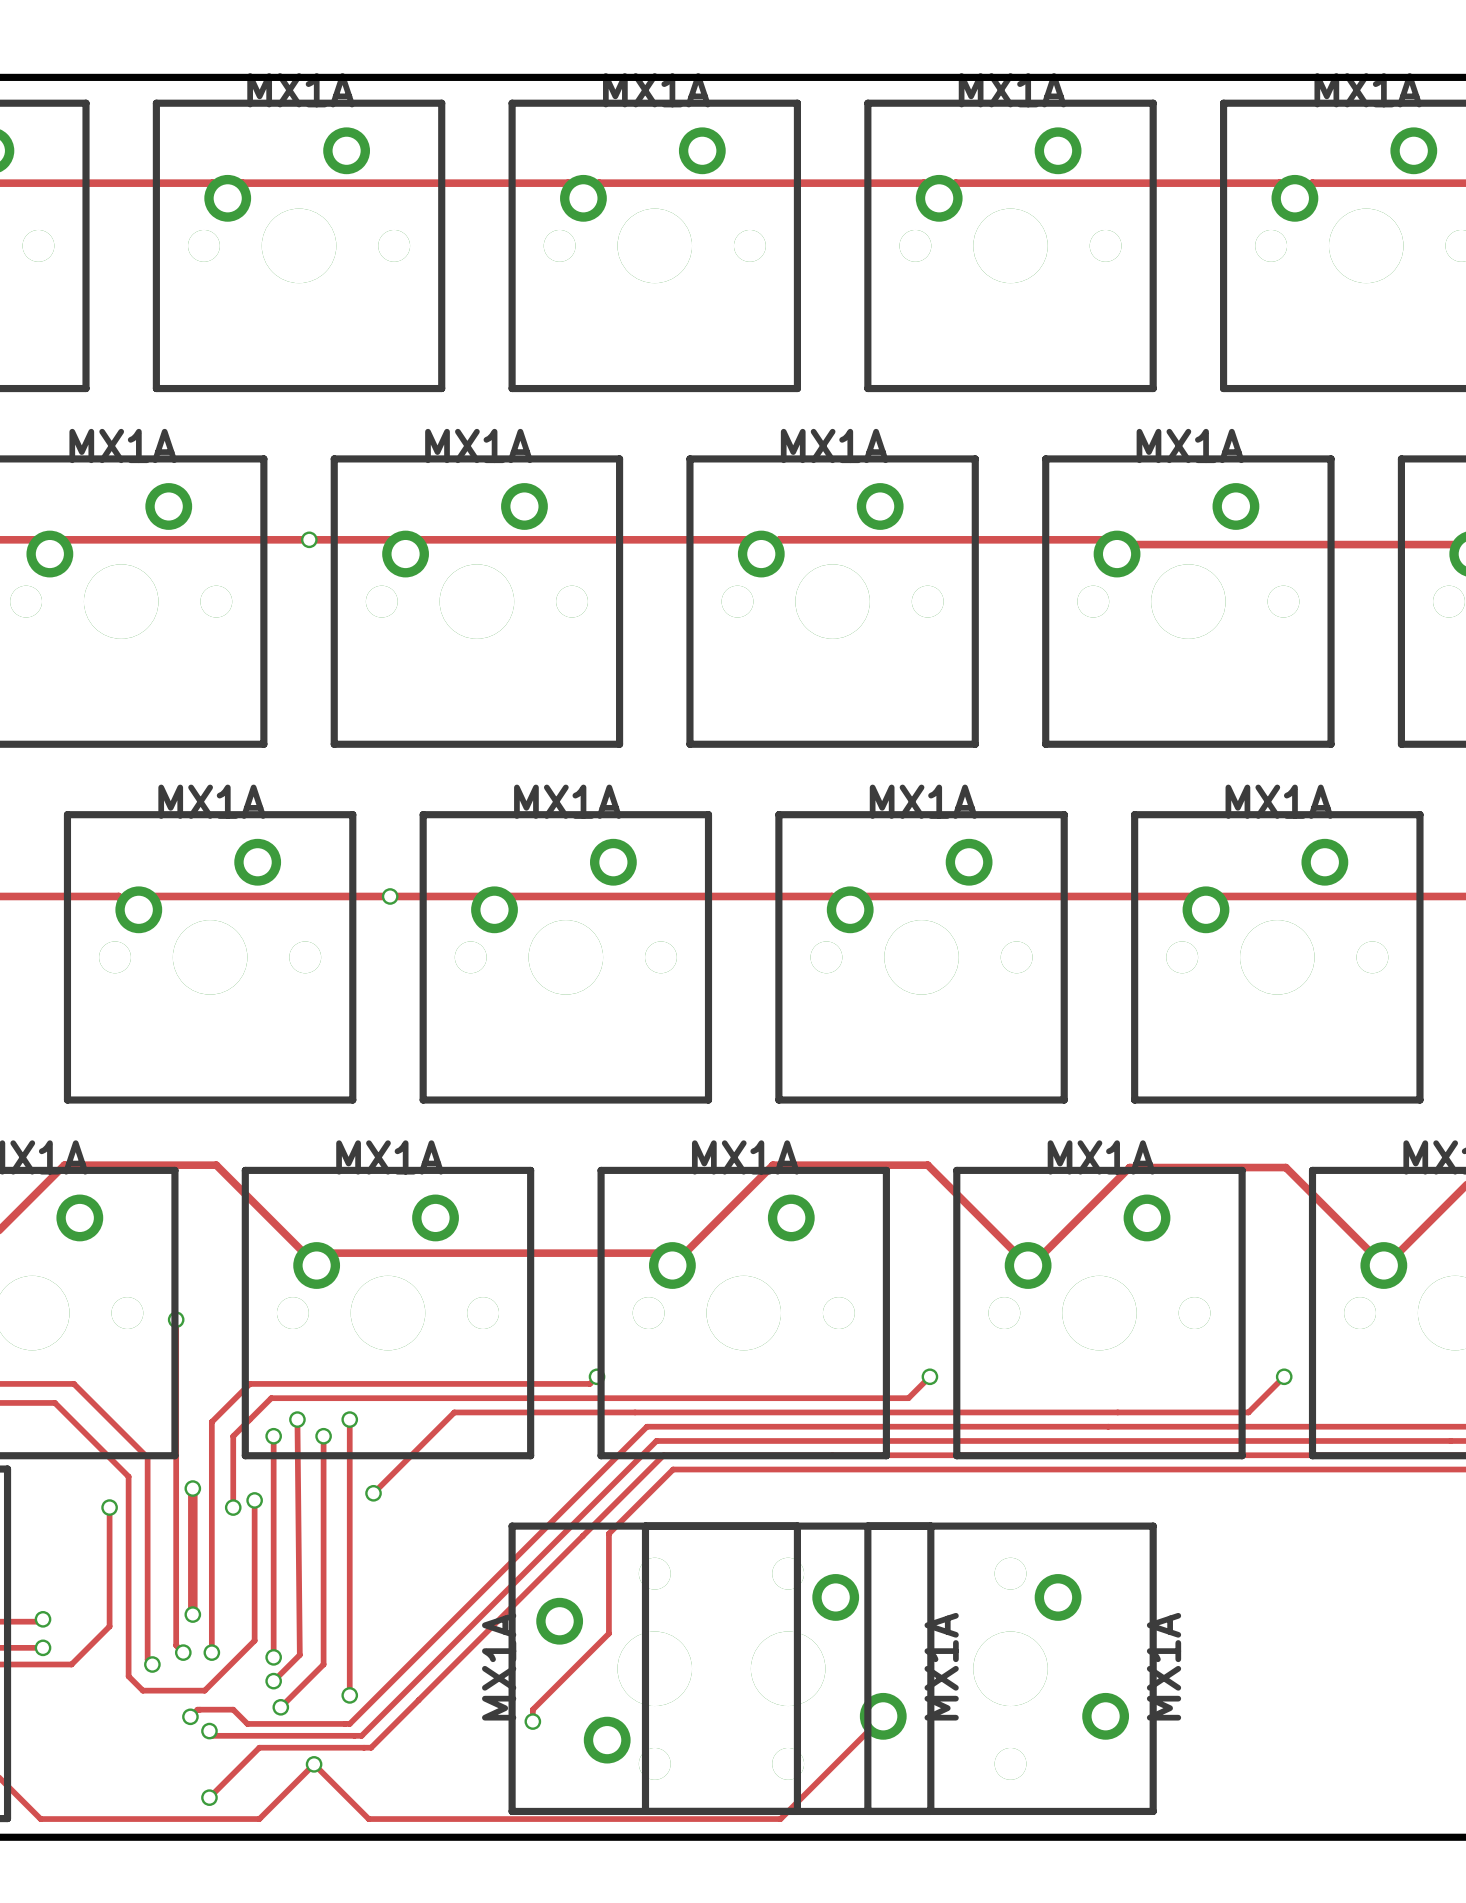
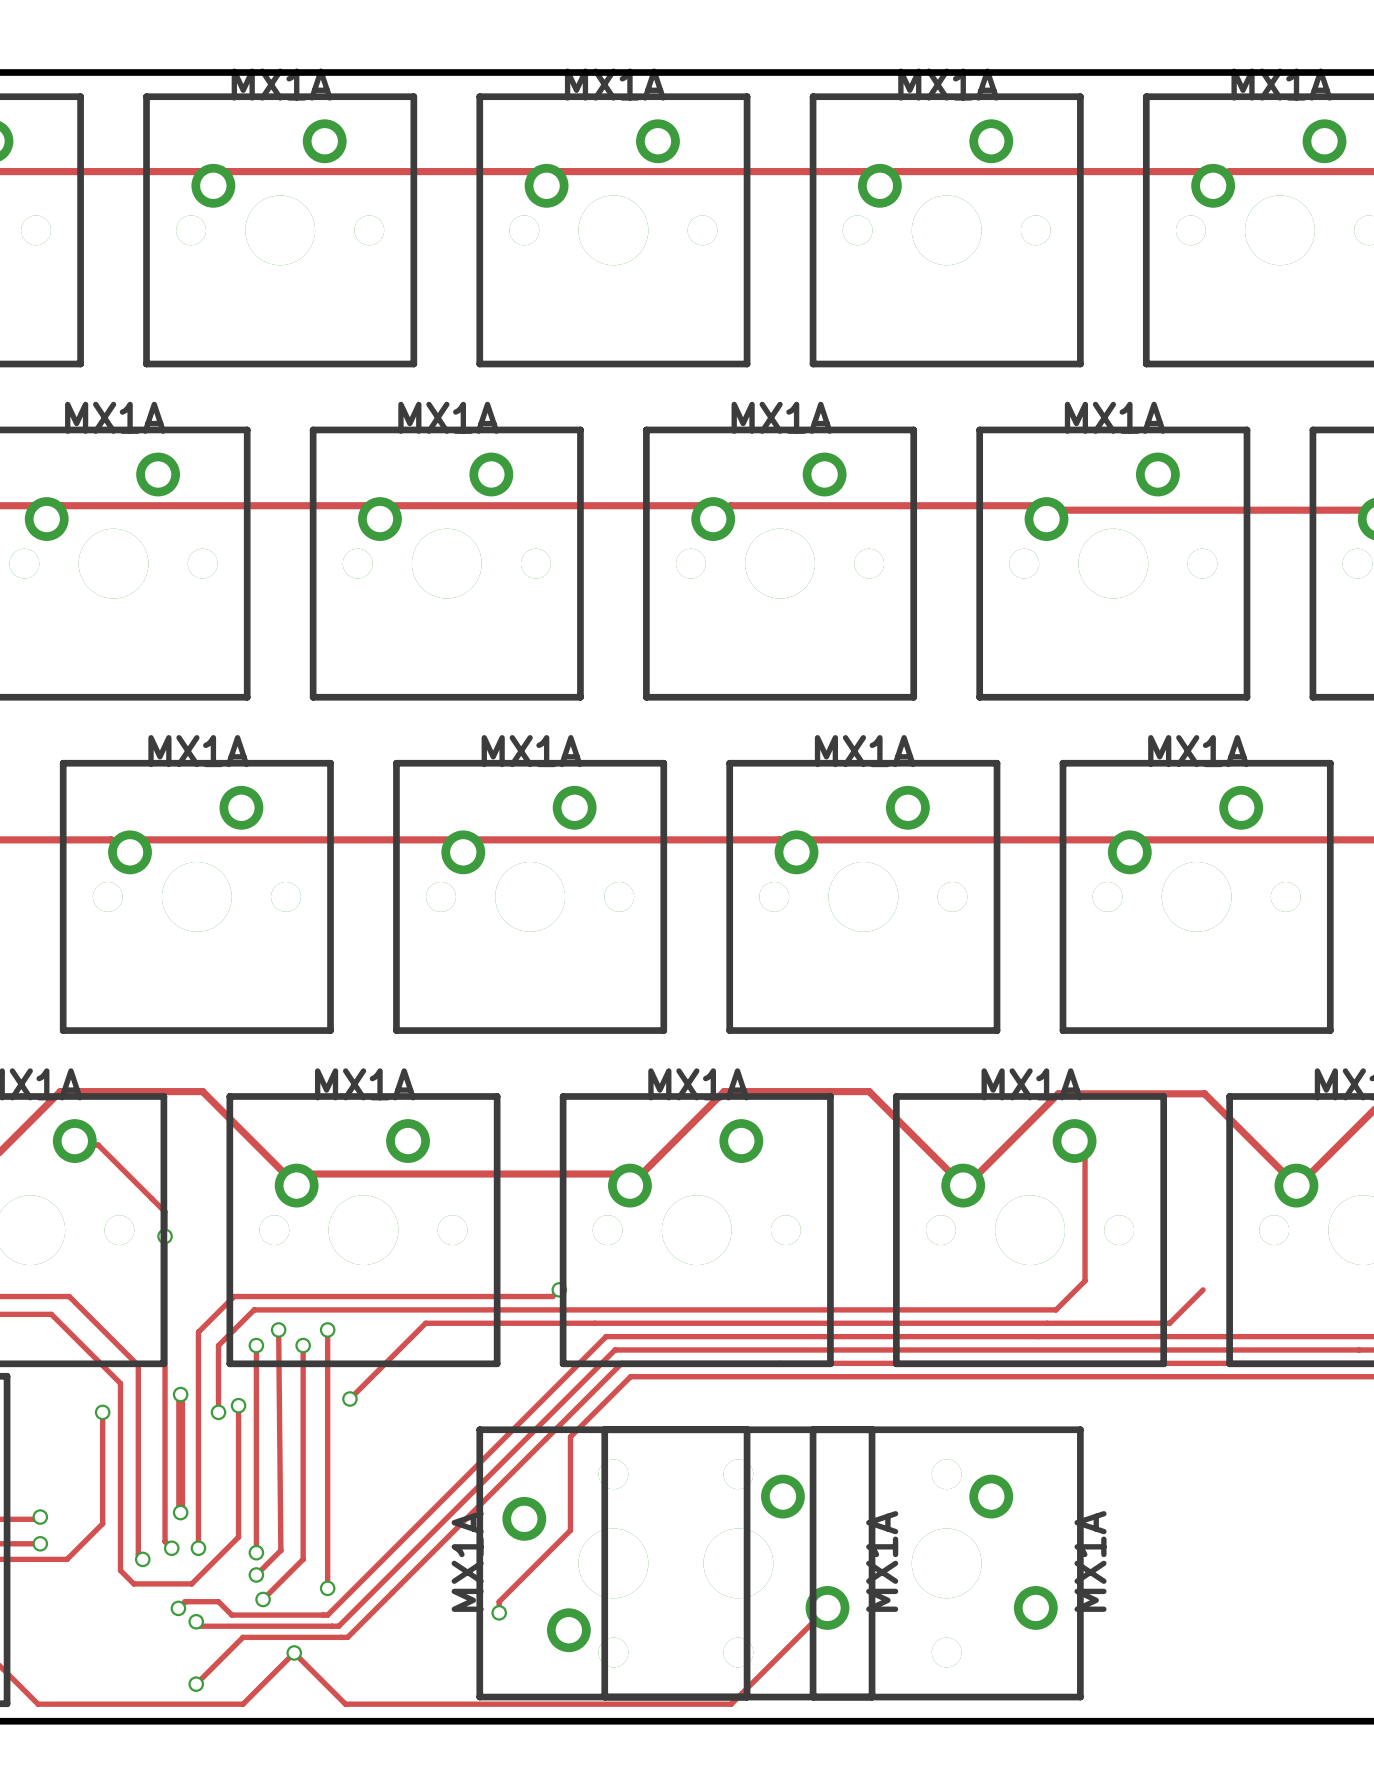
via: (309, 539) -> none
via: (390, 896) -> none
track: none -> (74, 1141) (78, 1145) (98, 1145) (165, 1211) (165, 1236)
track: (929, 1376) (908, 1398) -> (1085, 1151) (1085, 1280) (1056, 1309) (851, 1309)
via: (929, 1376) -> none
via: (1284, 1376) -> none

